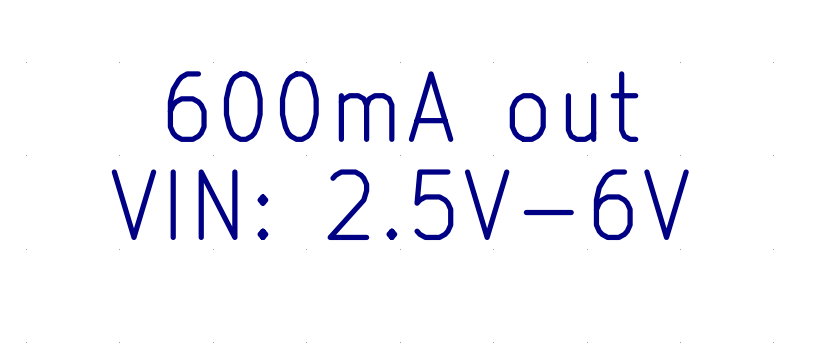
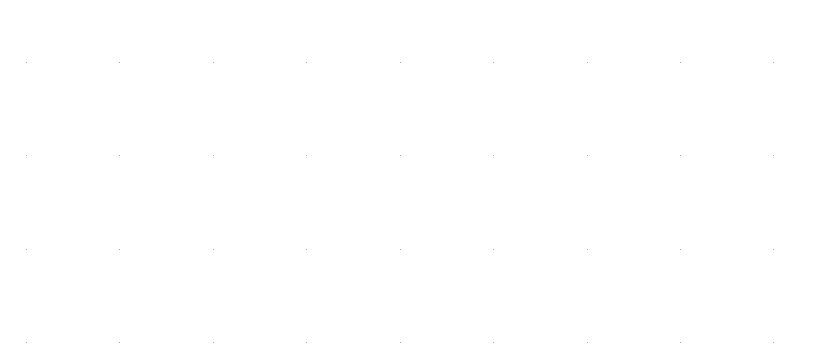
text: 600mA out (403, 106) -> none
text: VIN: 2.5V-6V (400, 204) -> none

